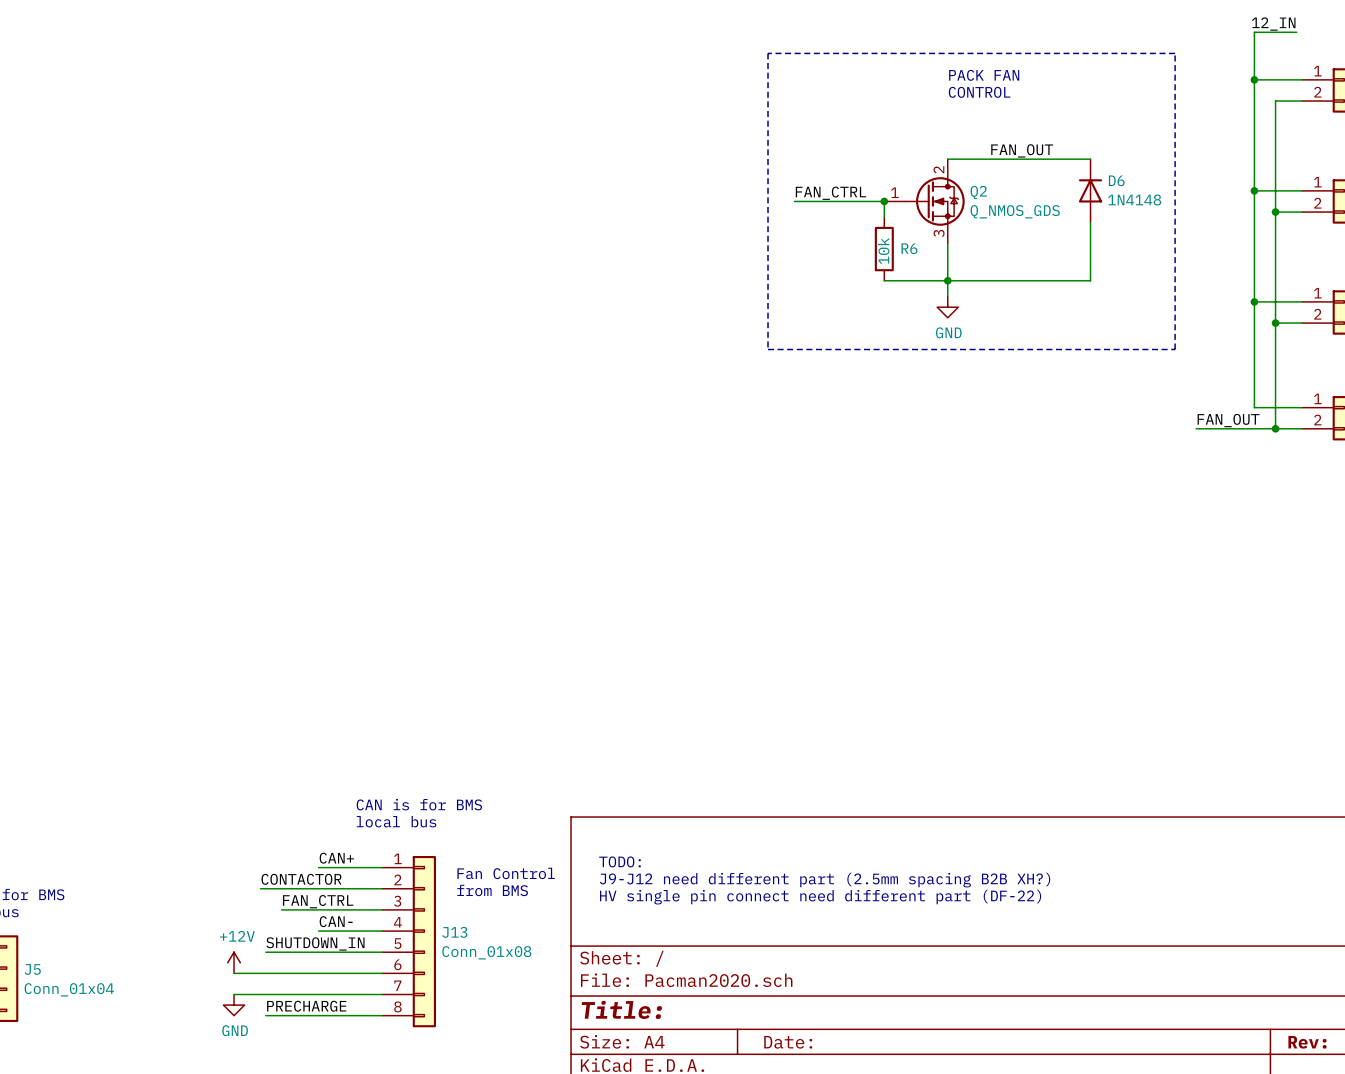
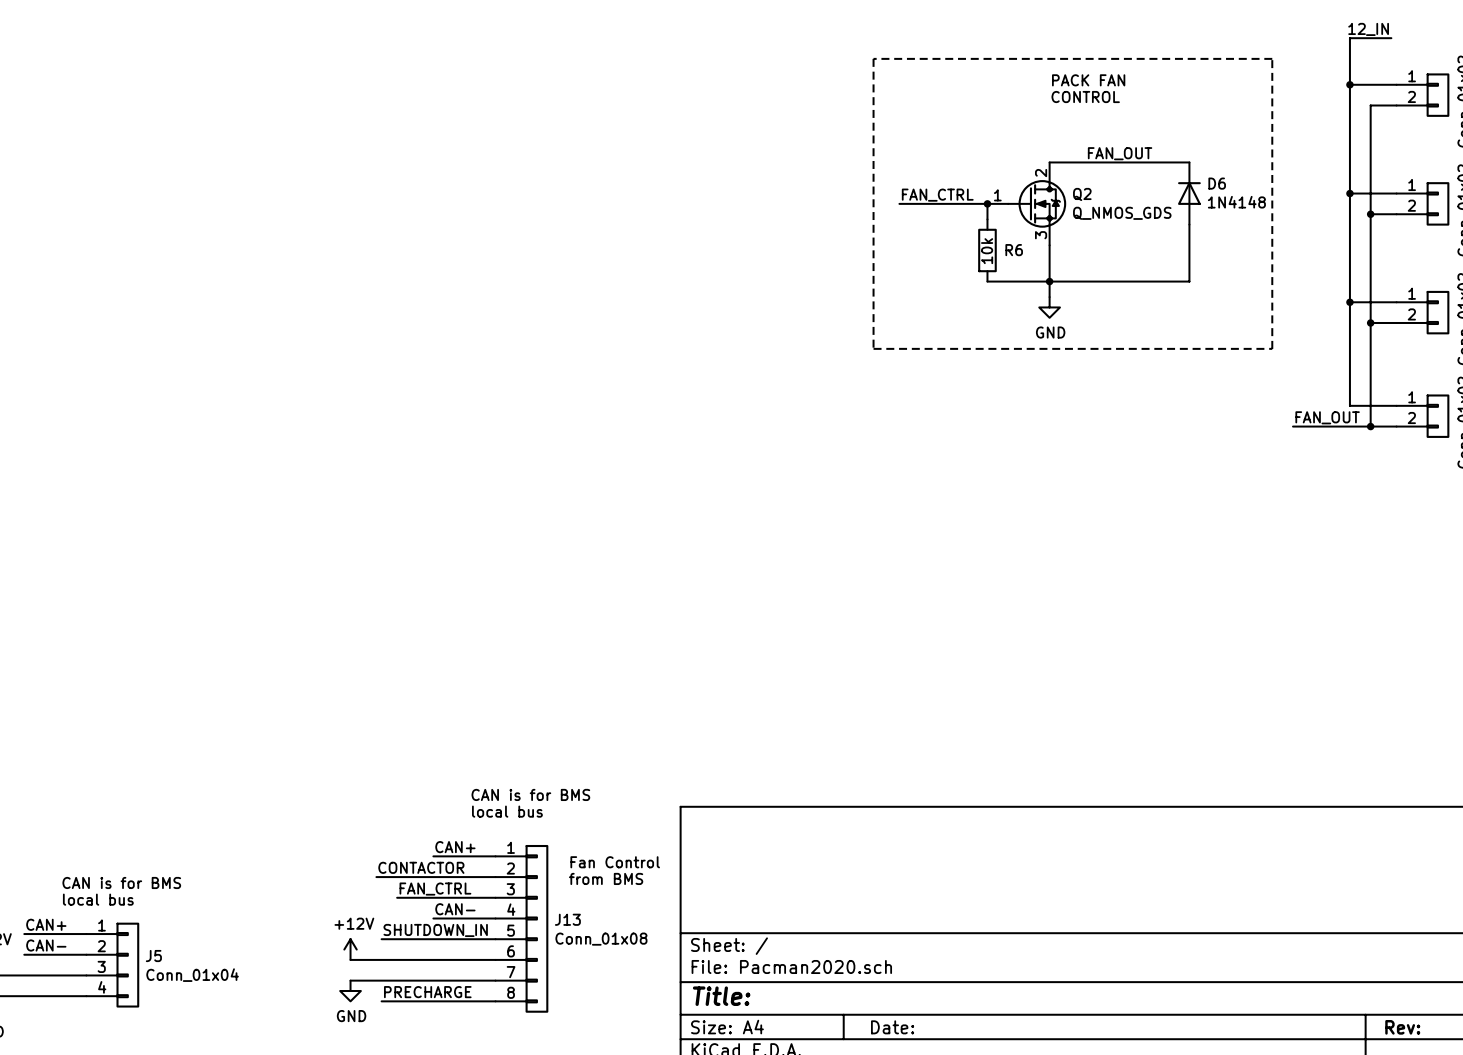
text: TODO: (620, 861) -> none
text: J9-J12 need different part (2.5mm spacing B2B XH?) (825, 880) -> none
text: HV single pin connect need different part (DF-22) (820, 897) -> none

